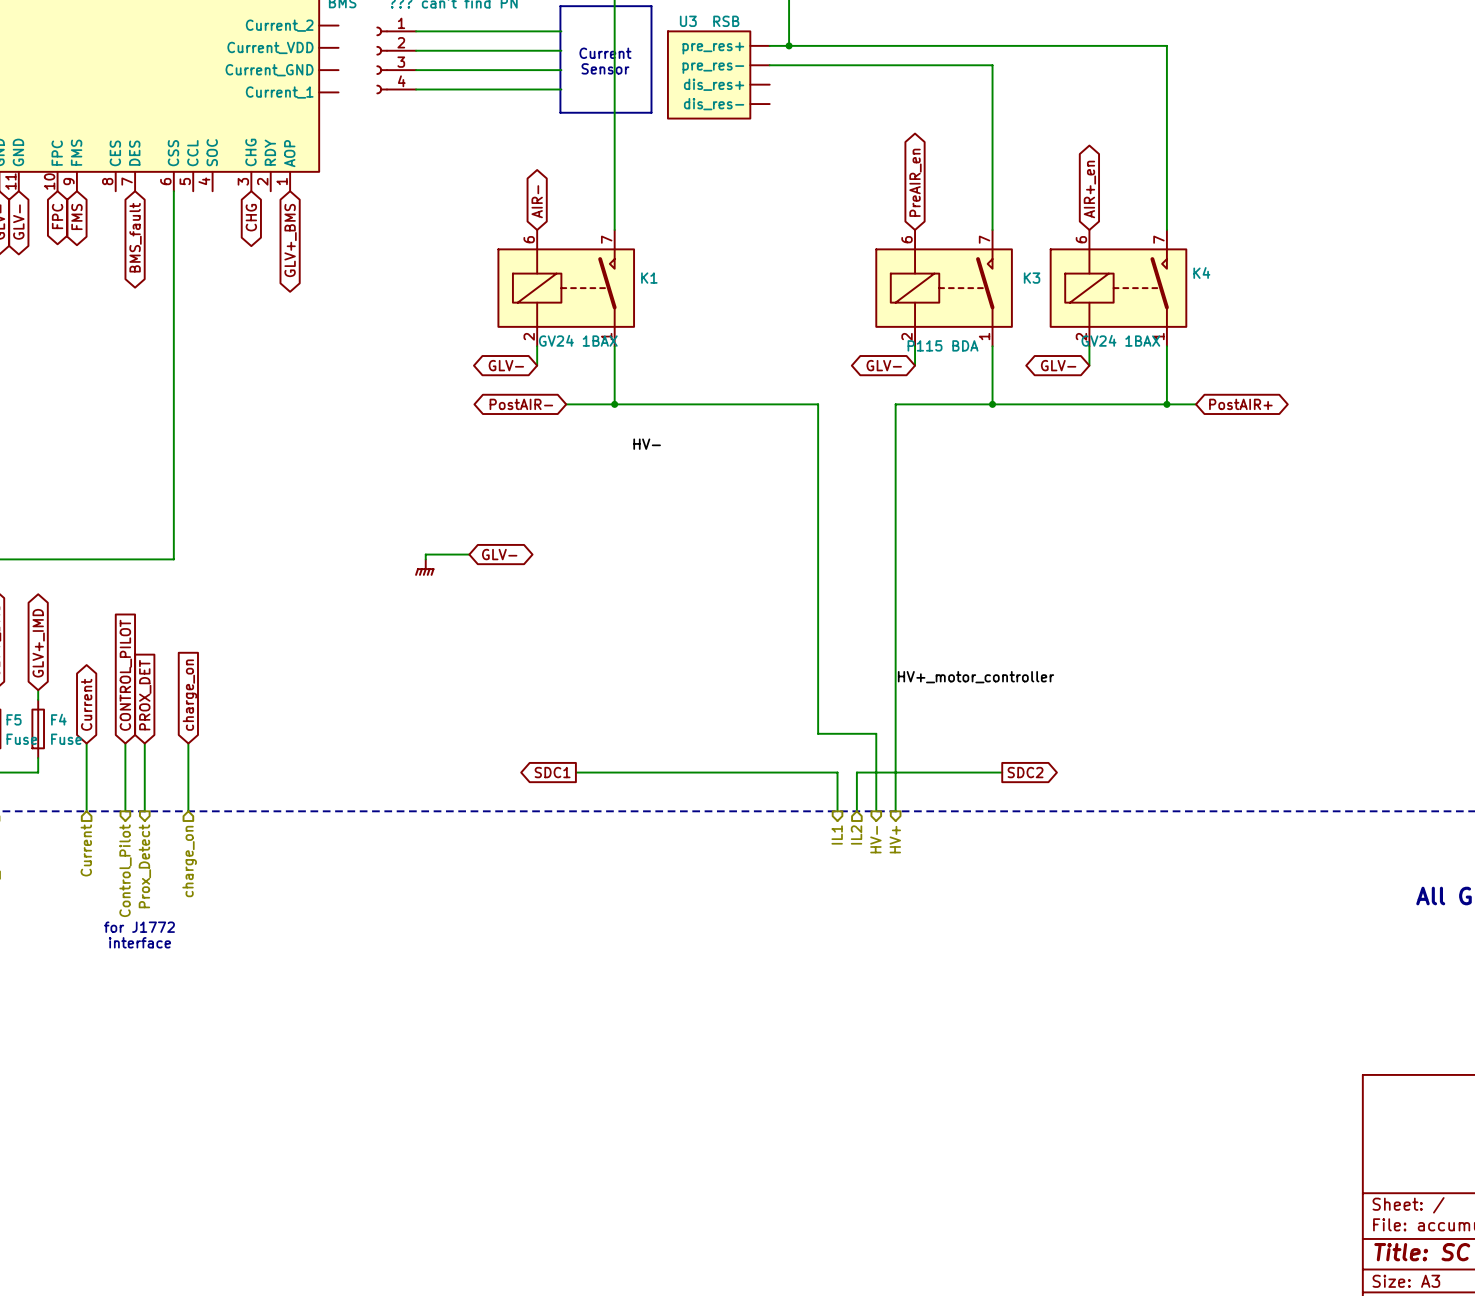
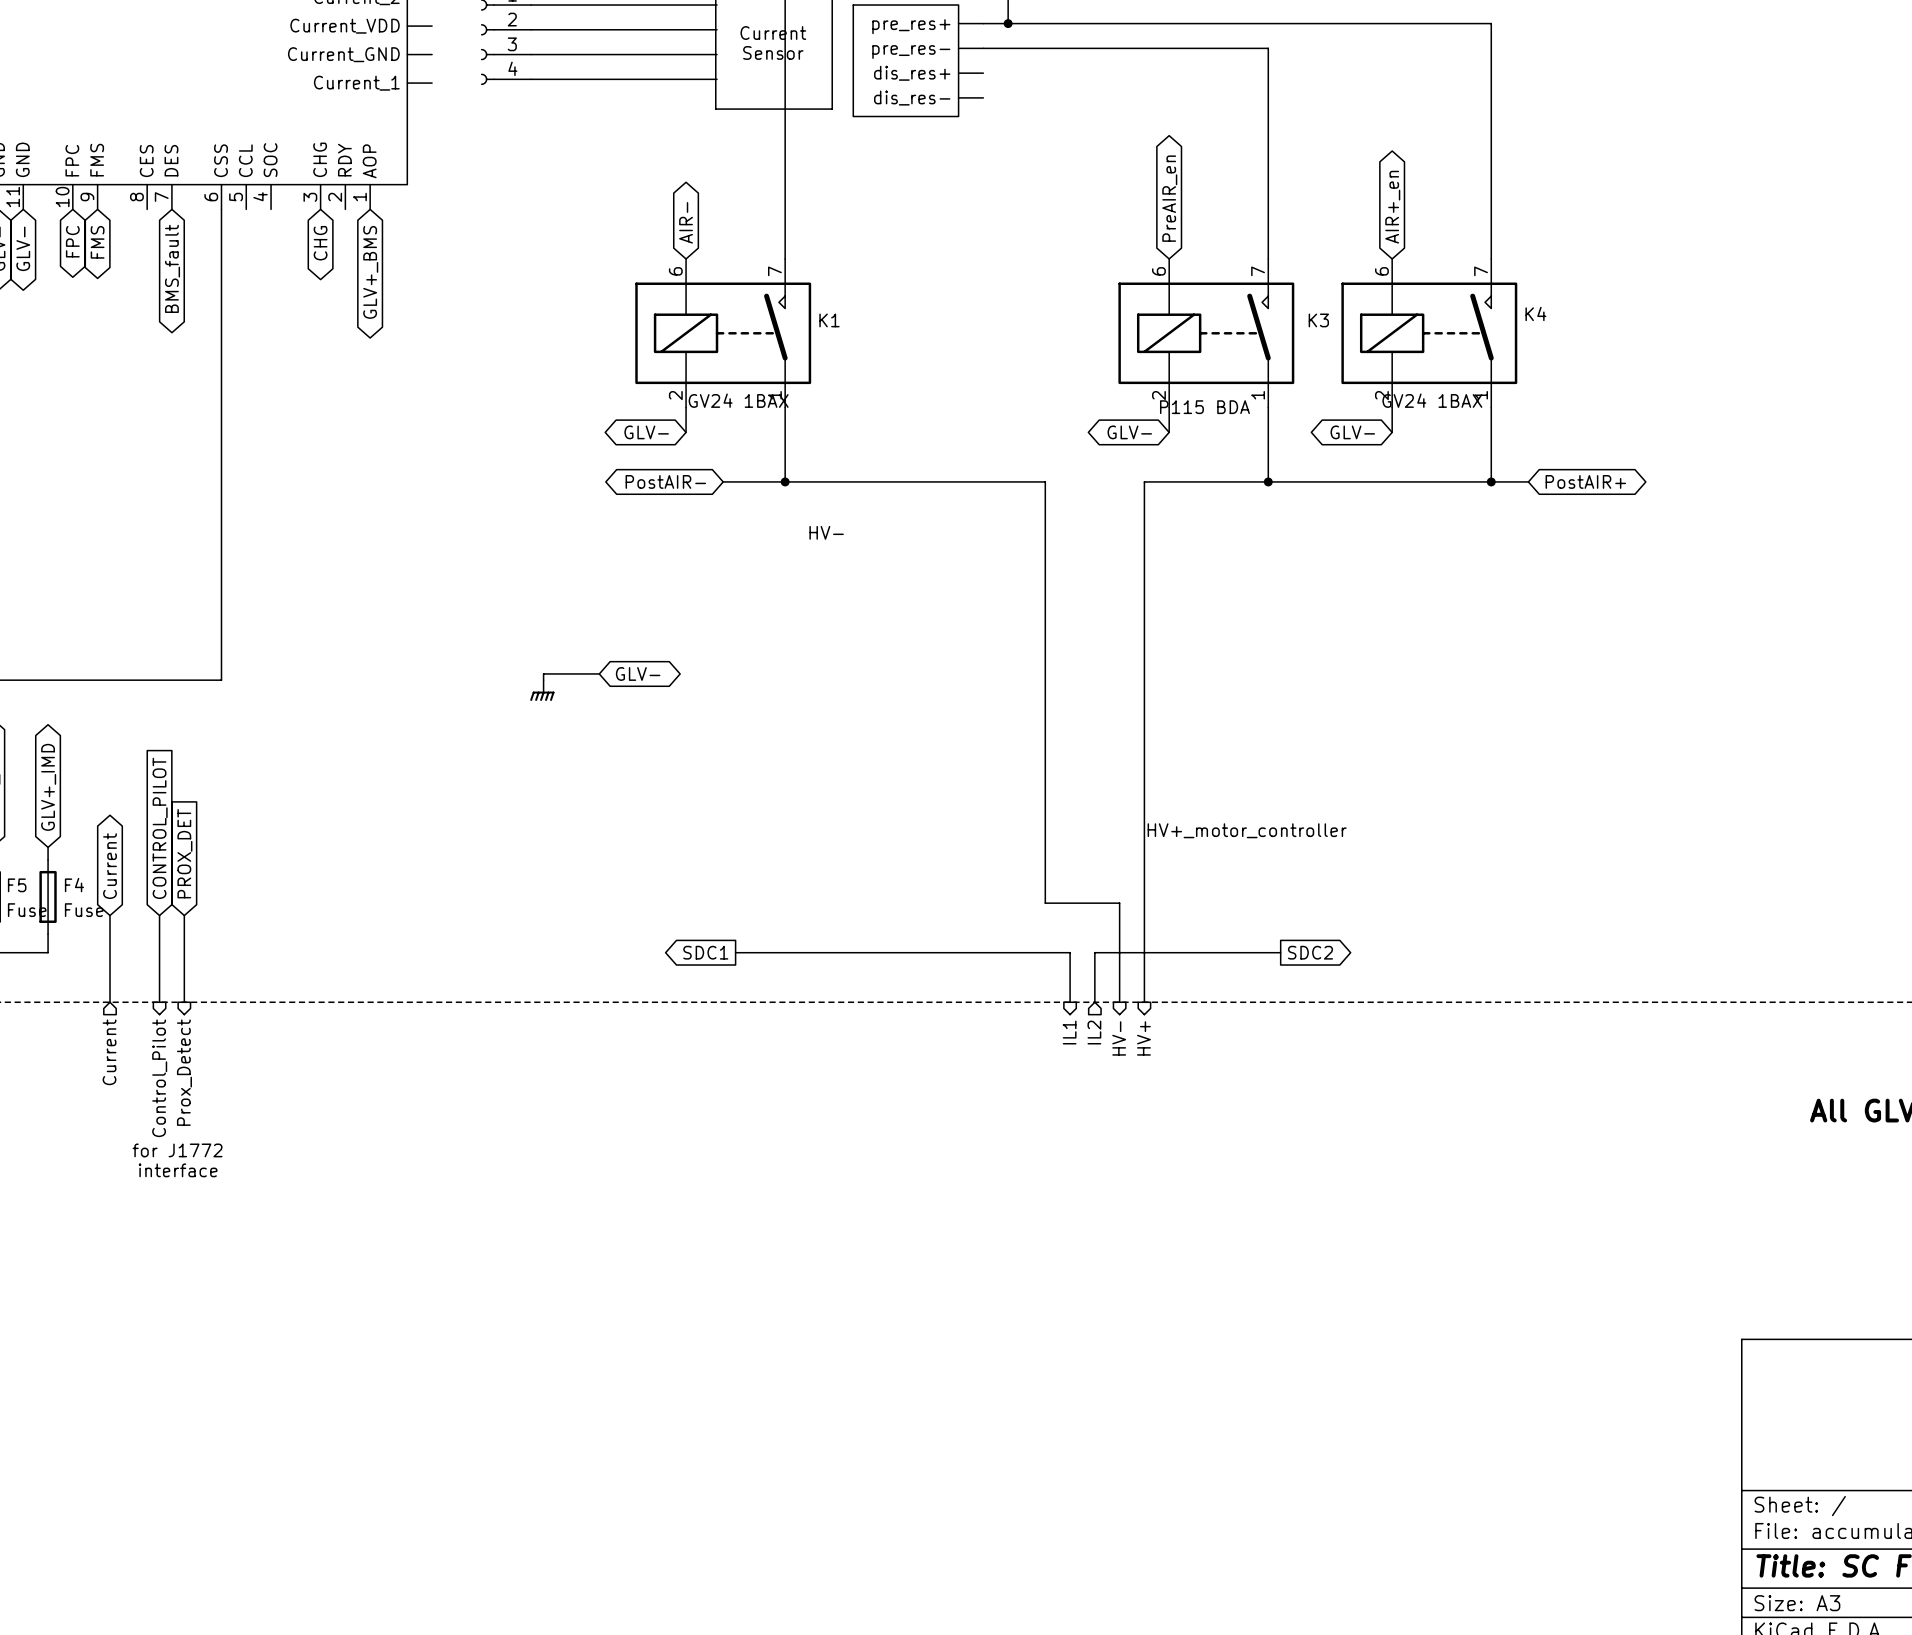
global label: charge_on (189, 695) -> none
wire: (188, 743) (188, 811) -> none
hierarchical label: charge_on (189, 861) -> none

